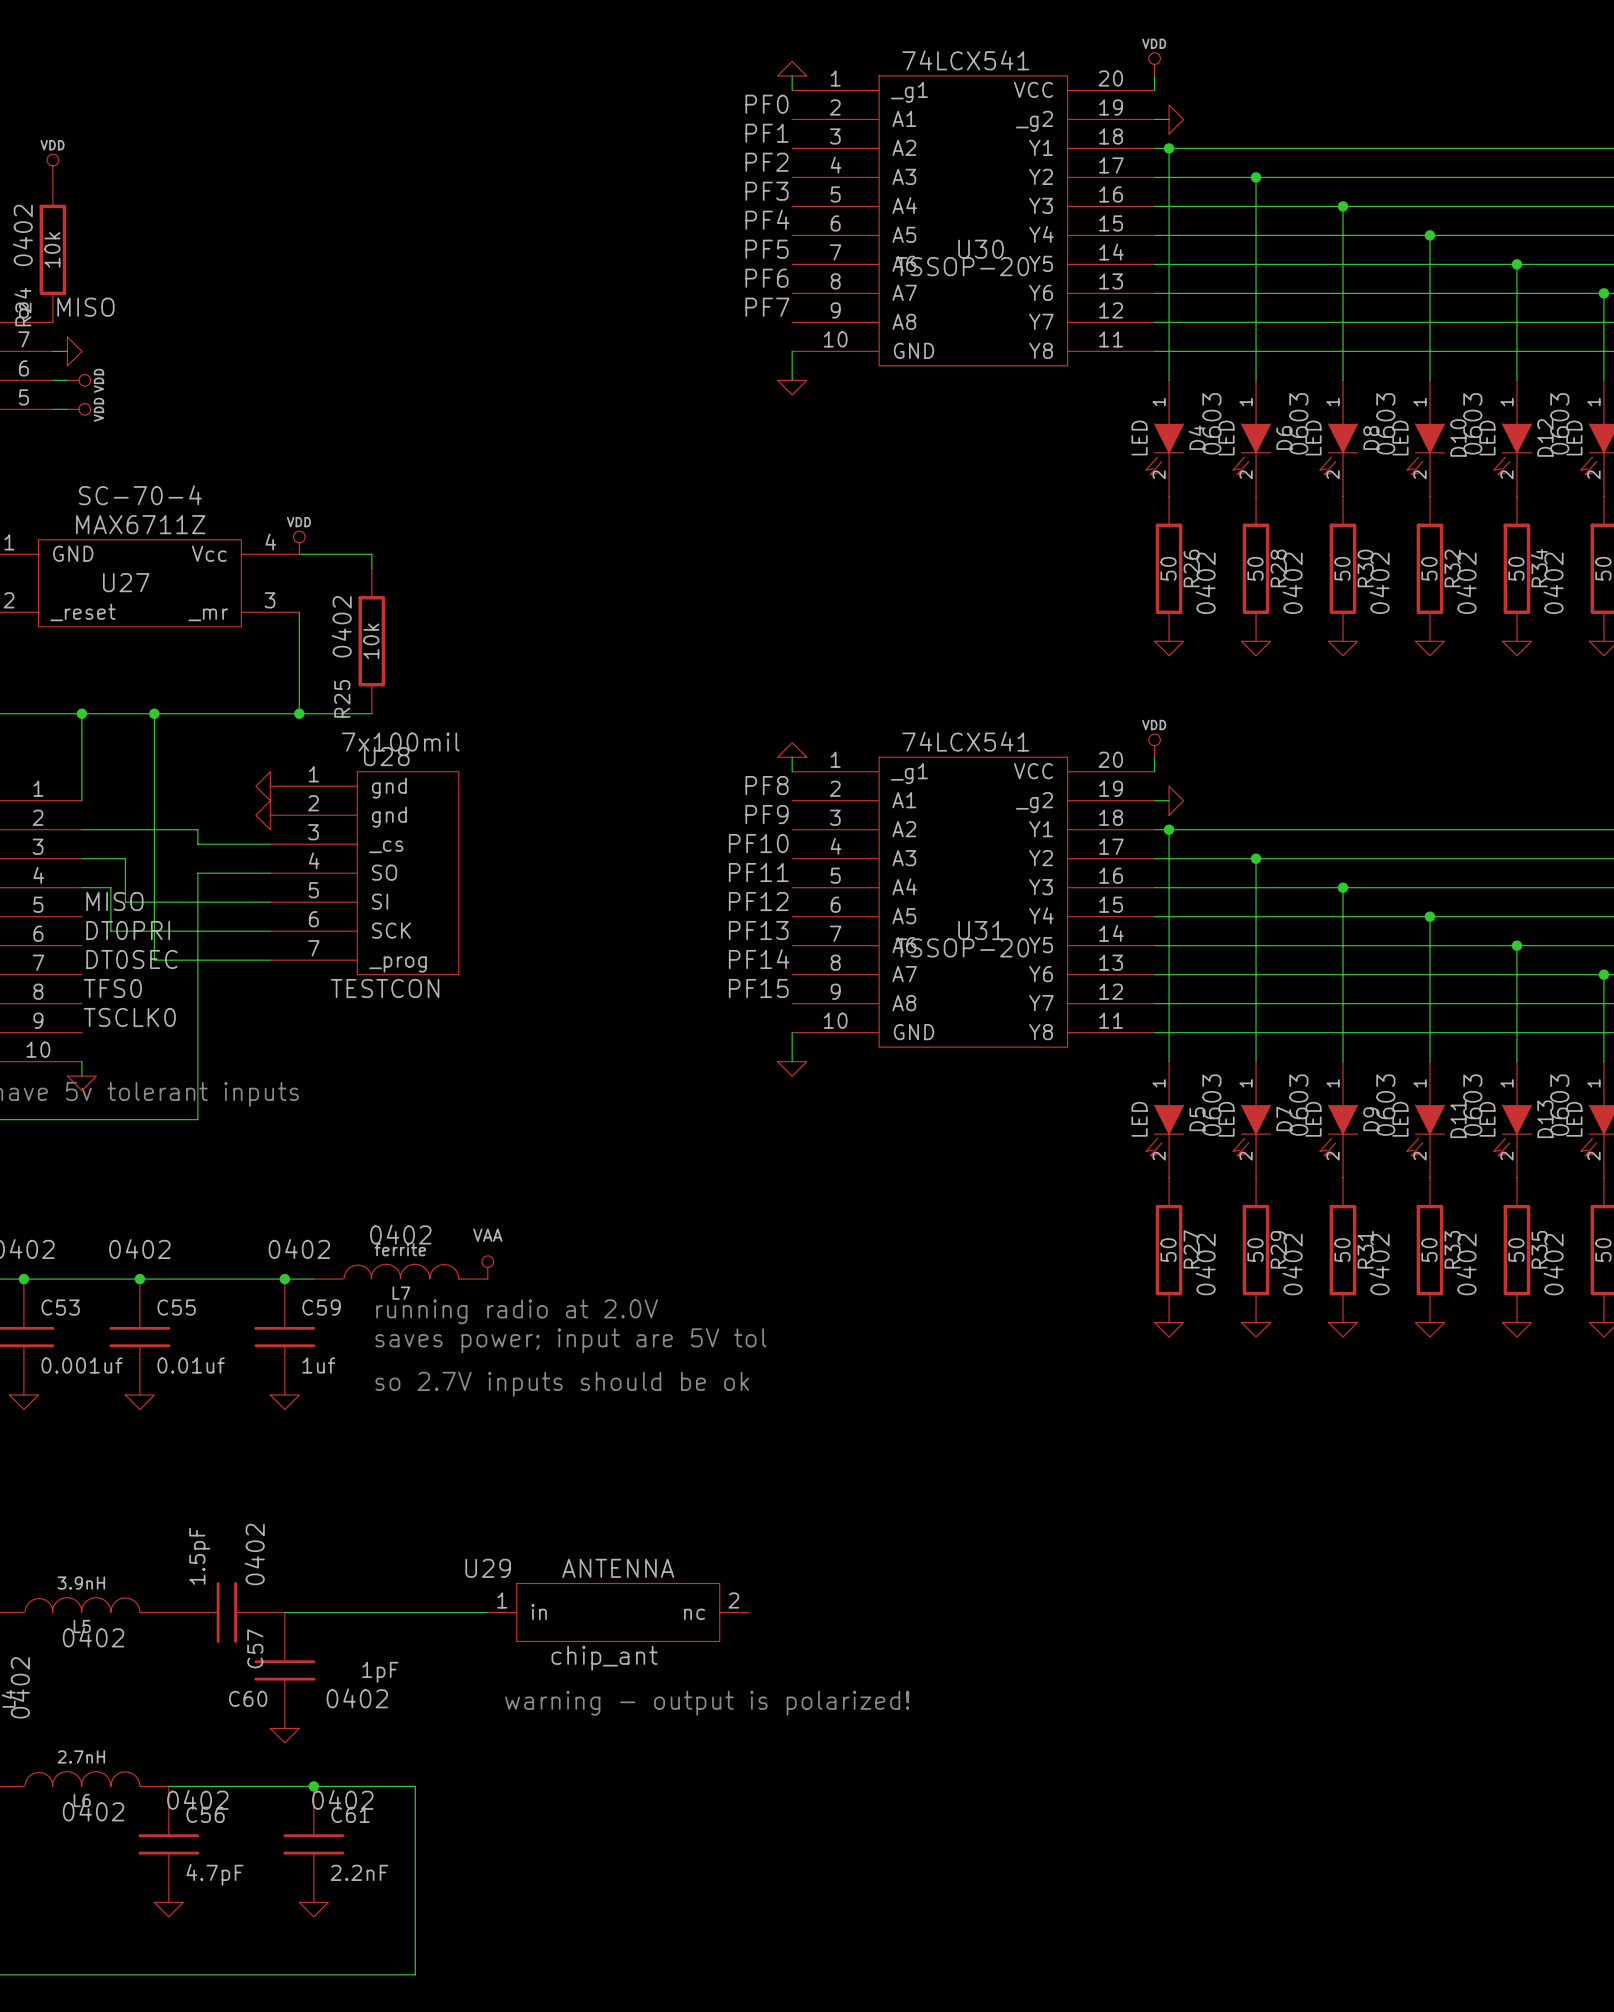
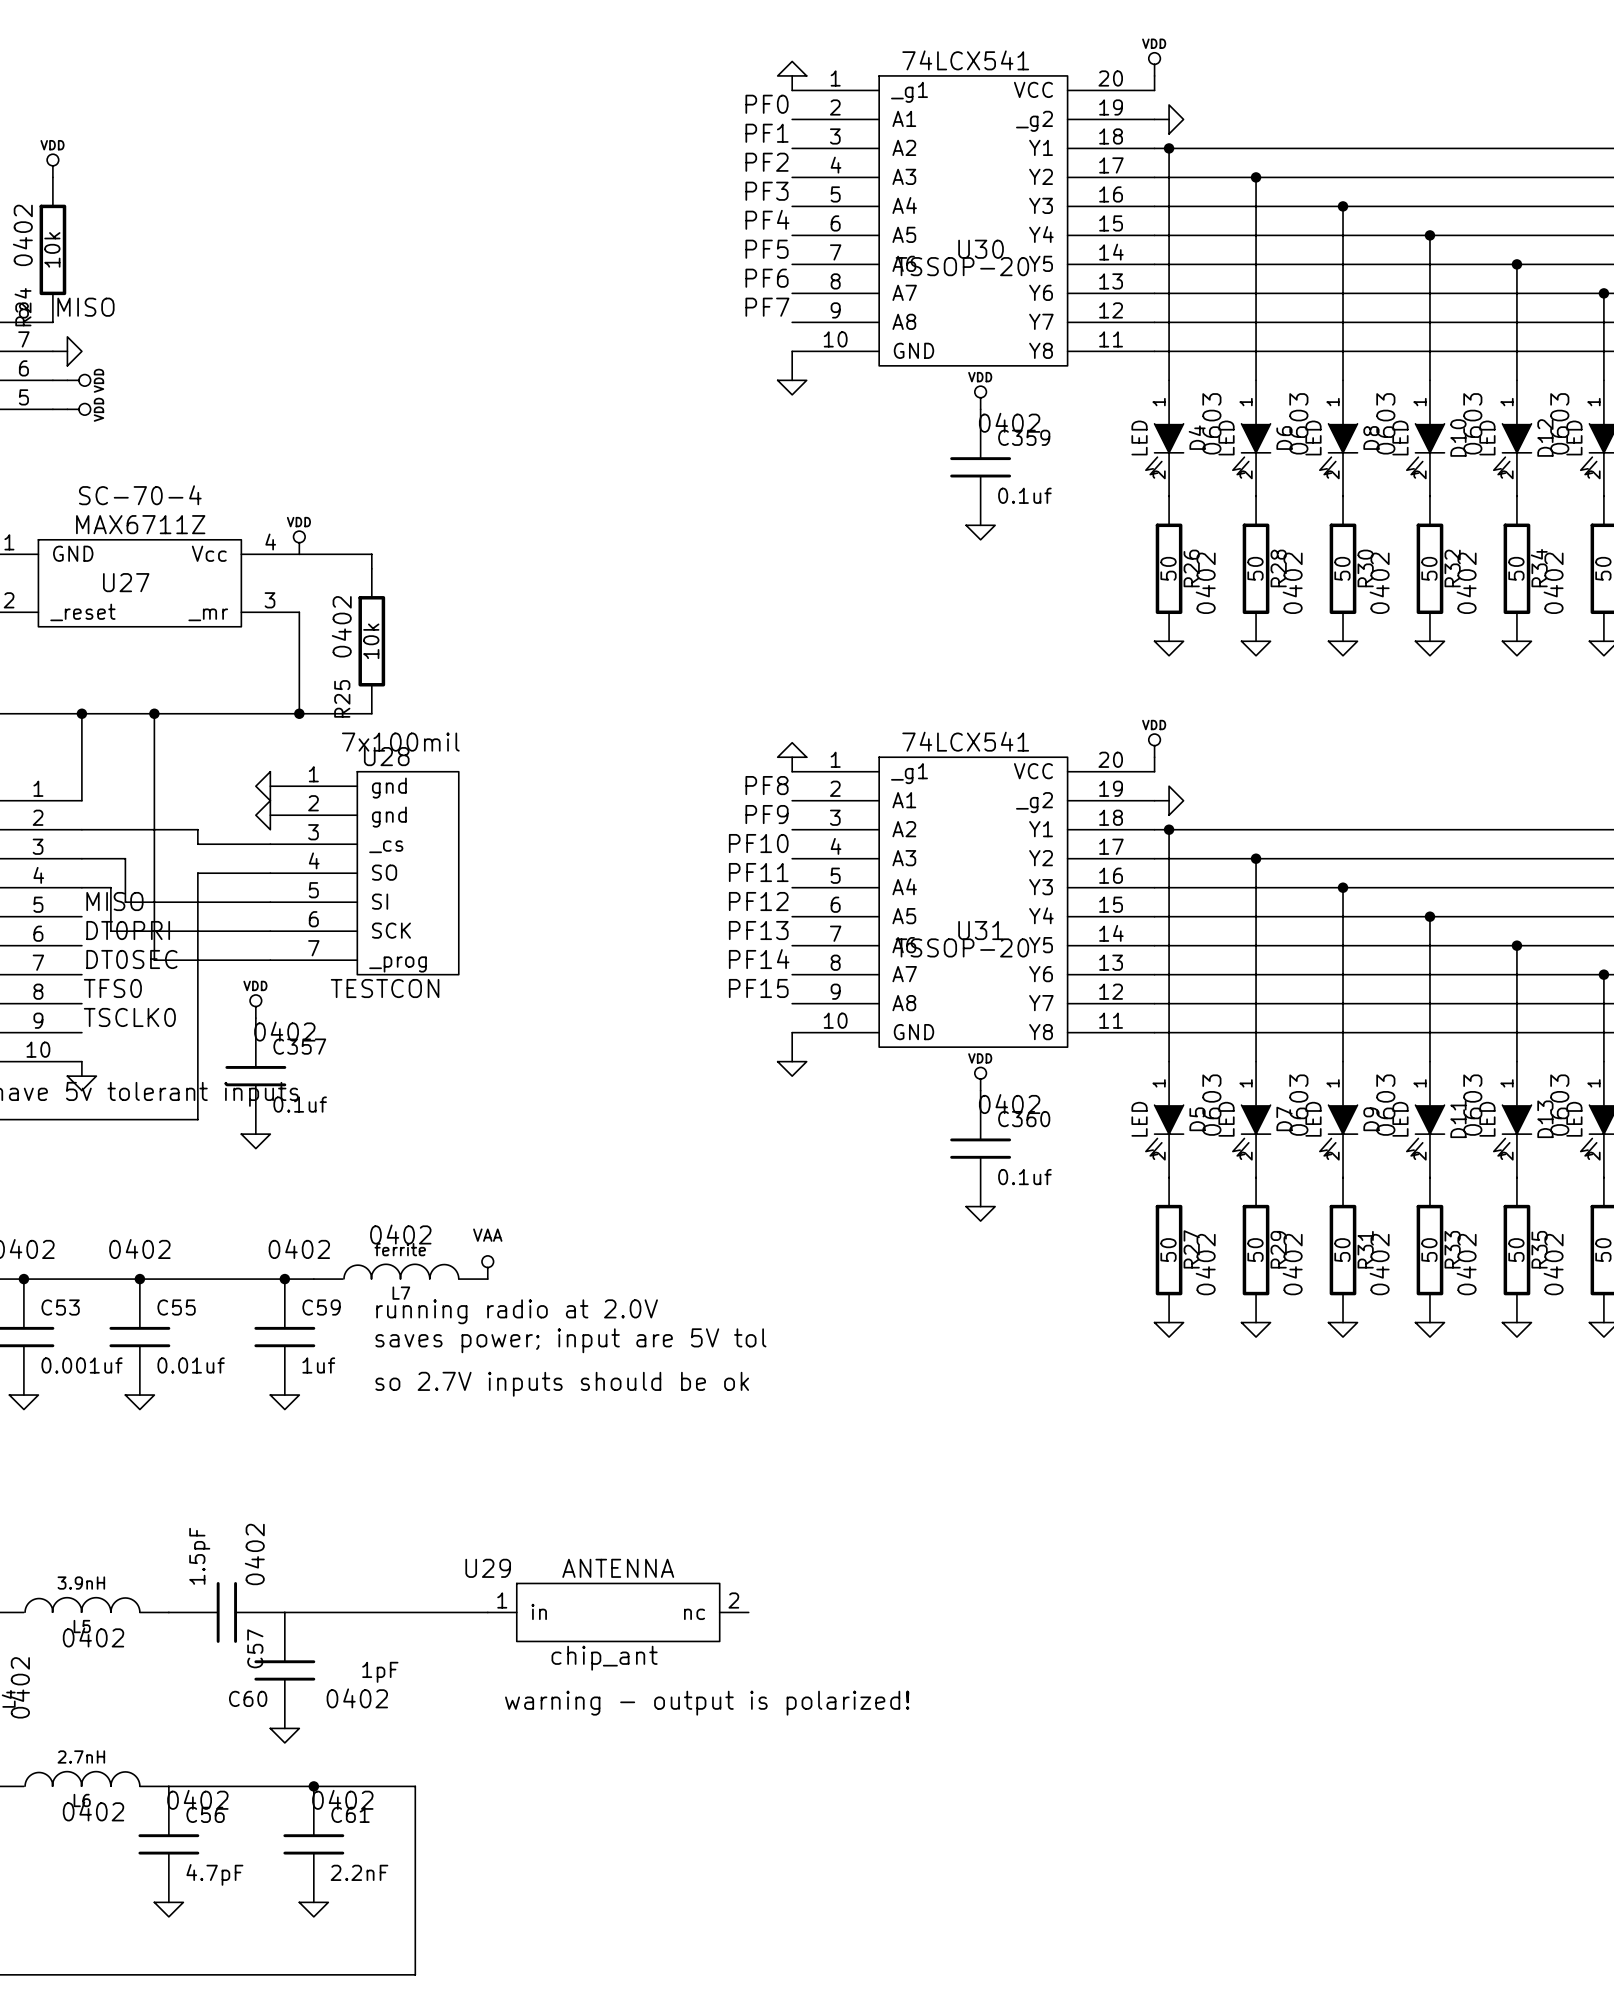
power symbol: none -> VDD (980, 397)
C359: none -> 0.1uf (980, 467)
power symbol: none -> (980, 532)
power symbol: none -> VDD (255, 1006)
C357: none -> 0.1uf (255, 1076)
power symbol: none -> VDD (980, 1079)
power symbol: none -> (255, 1141)
C360: none -> 0.1uf (980, 1148)
power symbol: none -> (980, 1213)

